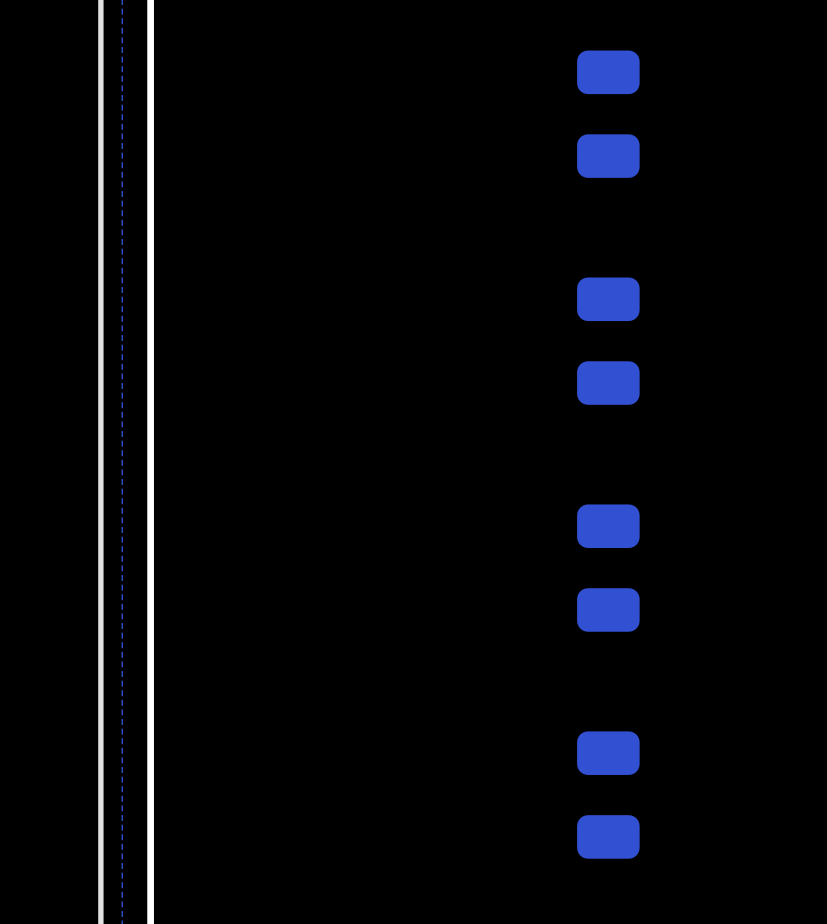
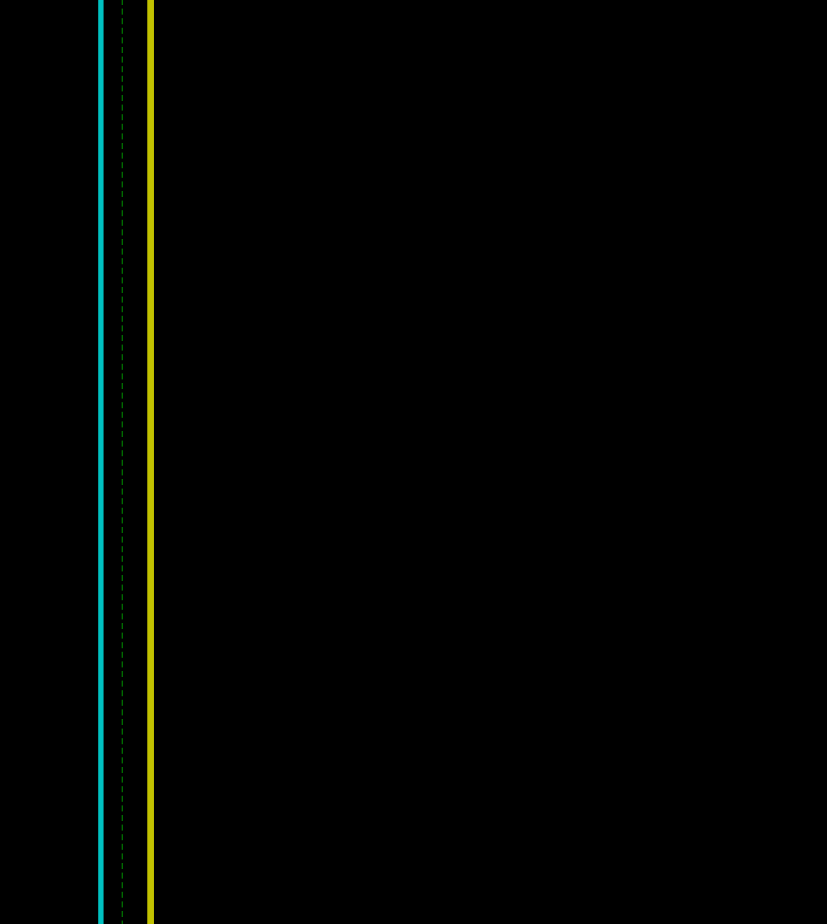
part: (608, 114) -> none
part: (608, 341) -> none
part: (608, 568) -> none
part: (608, 795) -> none

